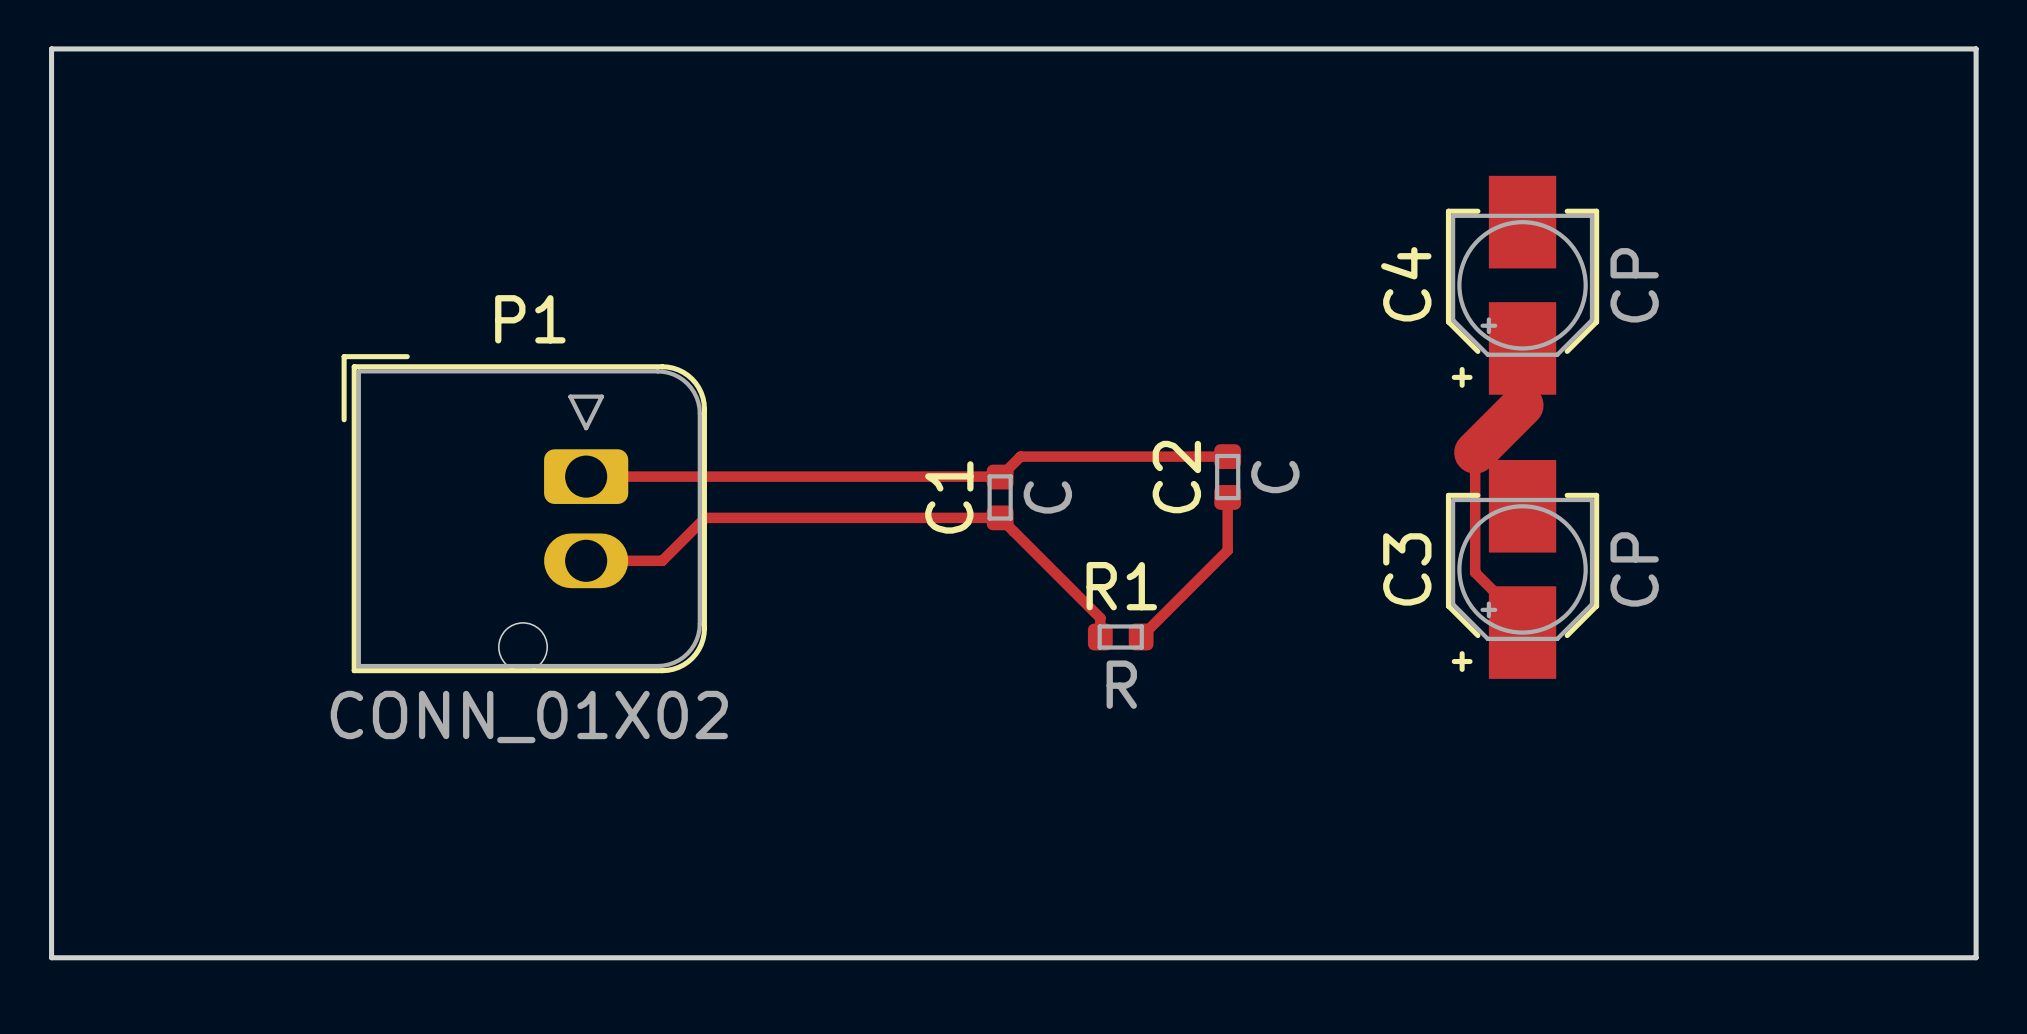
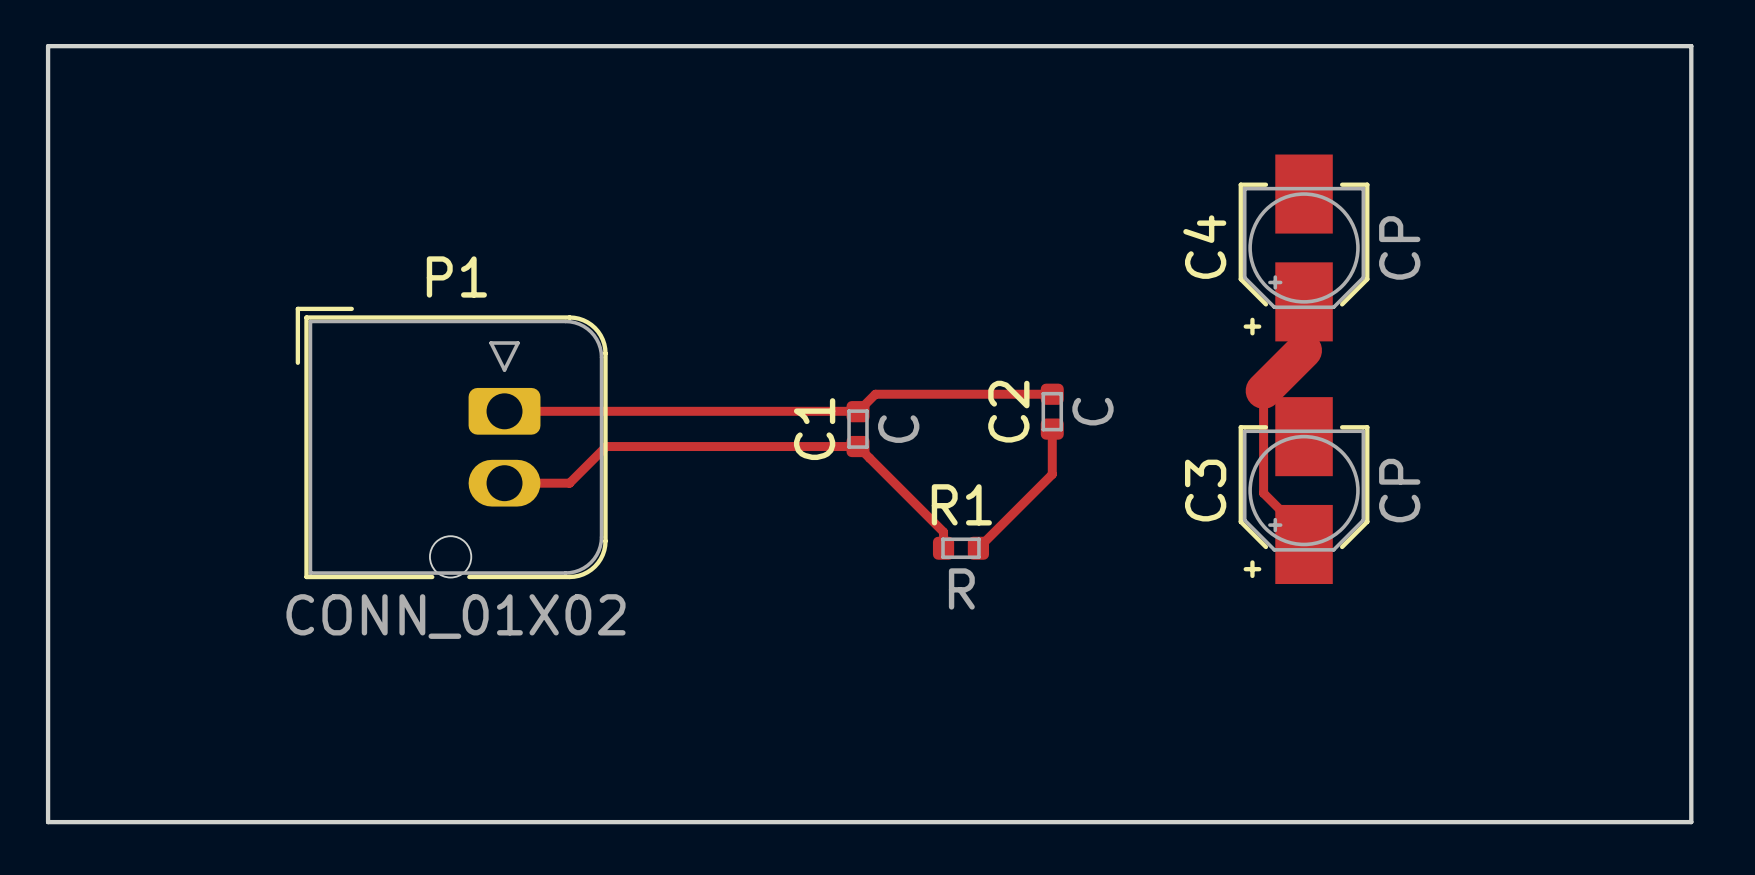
P1 footprint: [341, 354, 707, 674] -> [295, 306, 608, 580]

